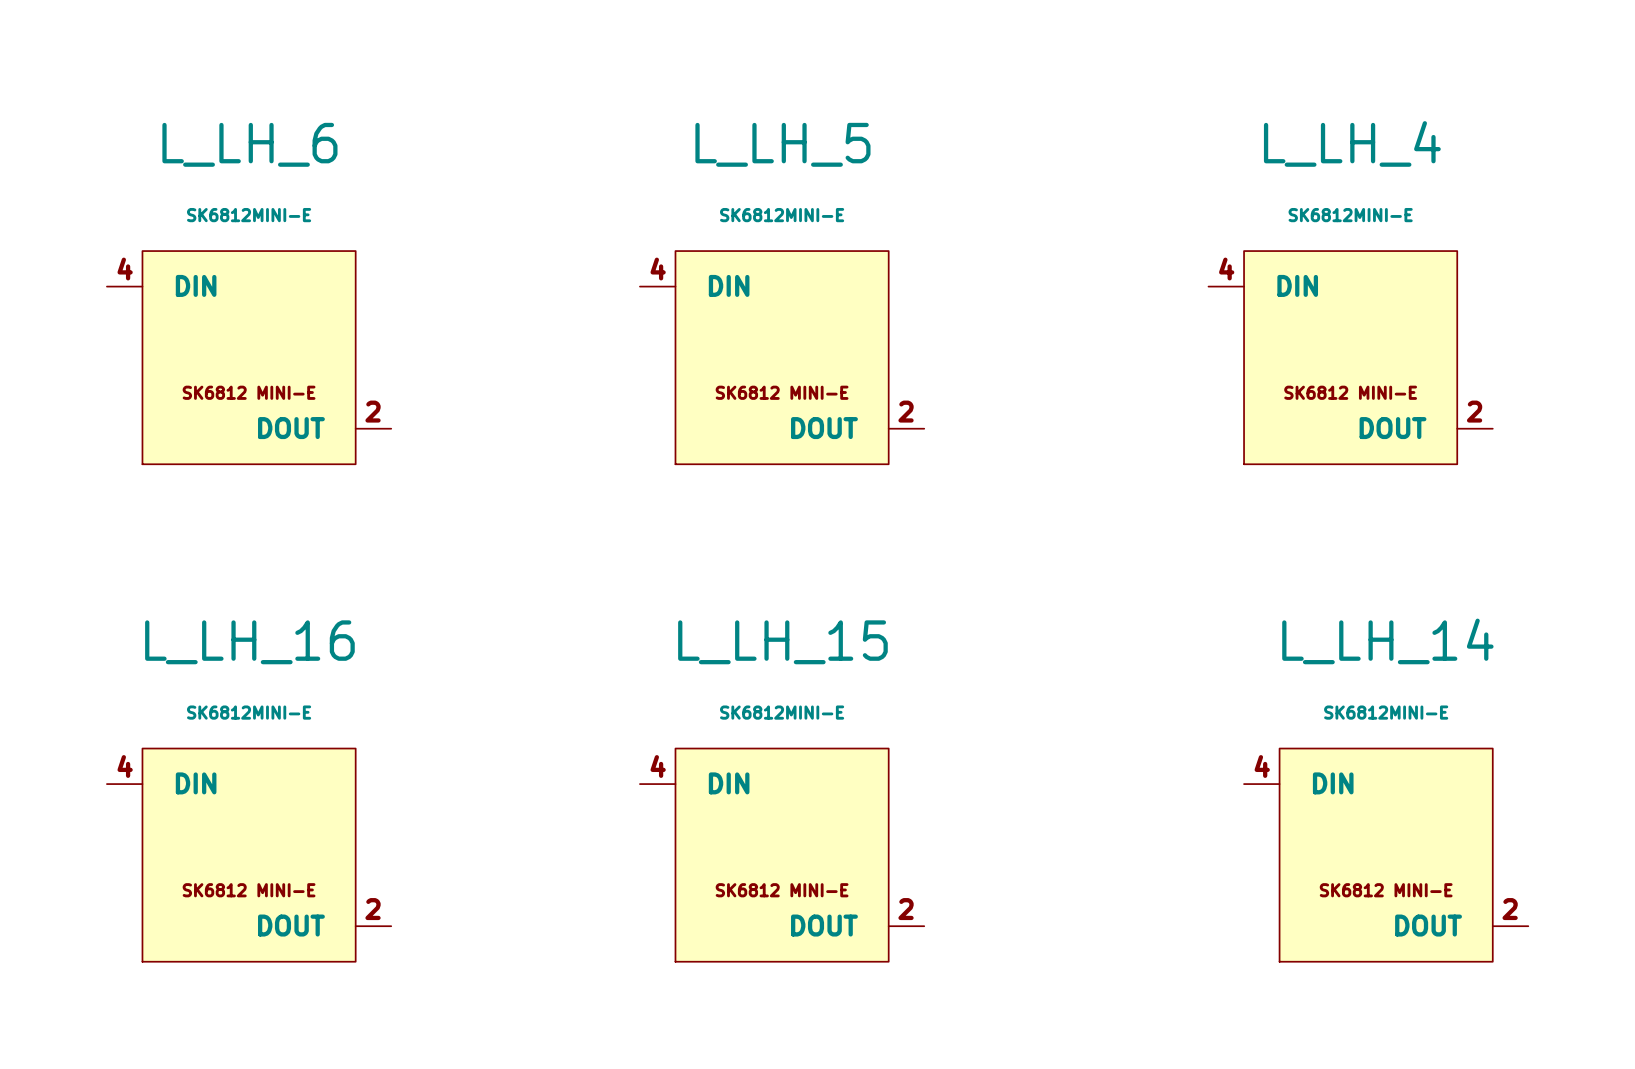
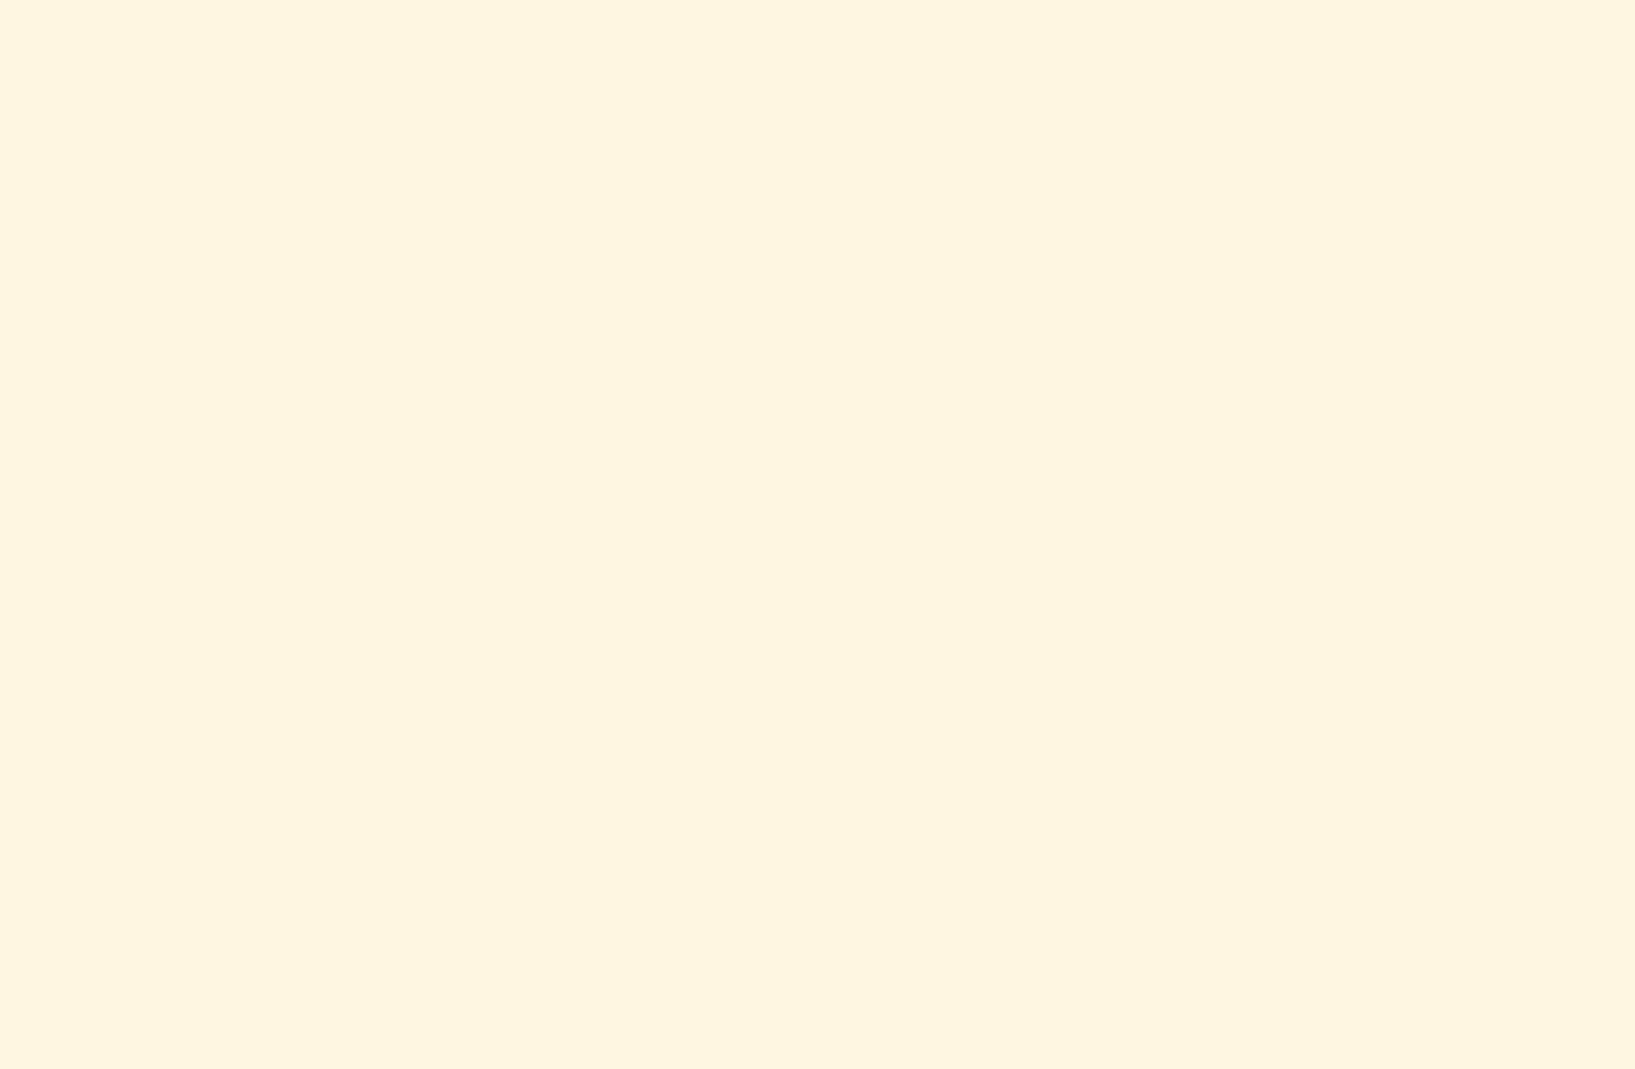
L_LH_6: SK6812MINI-E (249, 357) -> none
L_LH_5: SK6812MINI-E (782, 357) -> none
L_LH_4: SK6812MINI-E (1350, 357) -> none
L_LH_16: SK6812MINI-E (249, 855) -> none
L_LH_15: SK6812MINI-E (782, 855) -> none
L_LH_14: SK6812MINI-E (1386, 855) -> none

